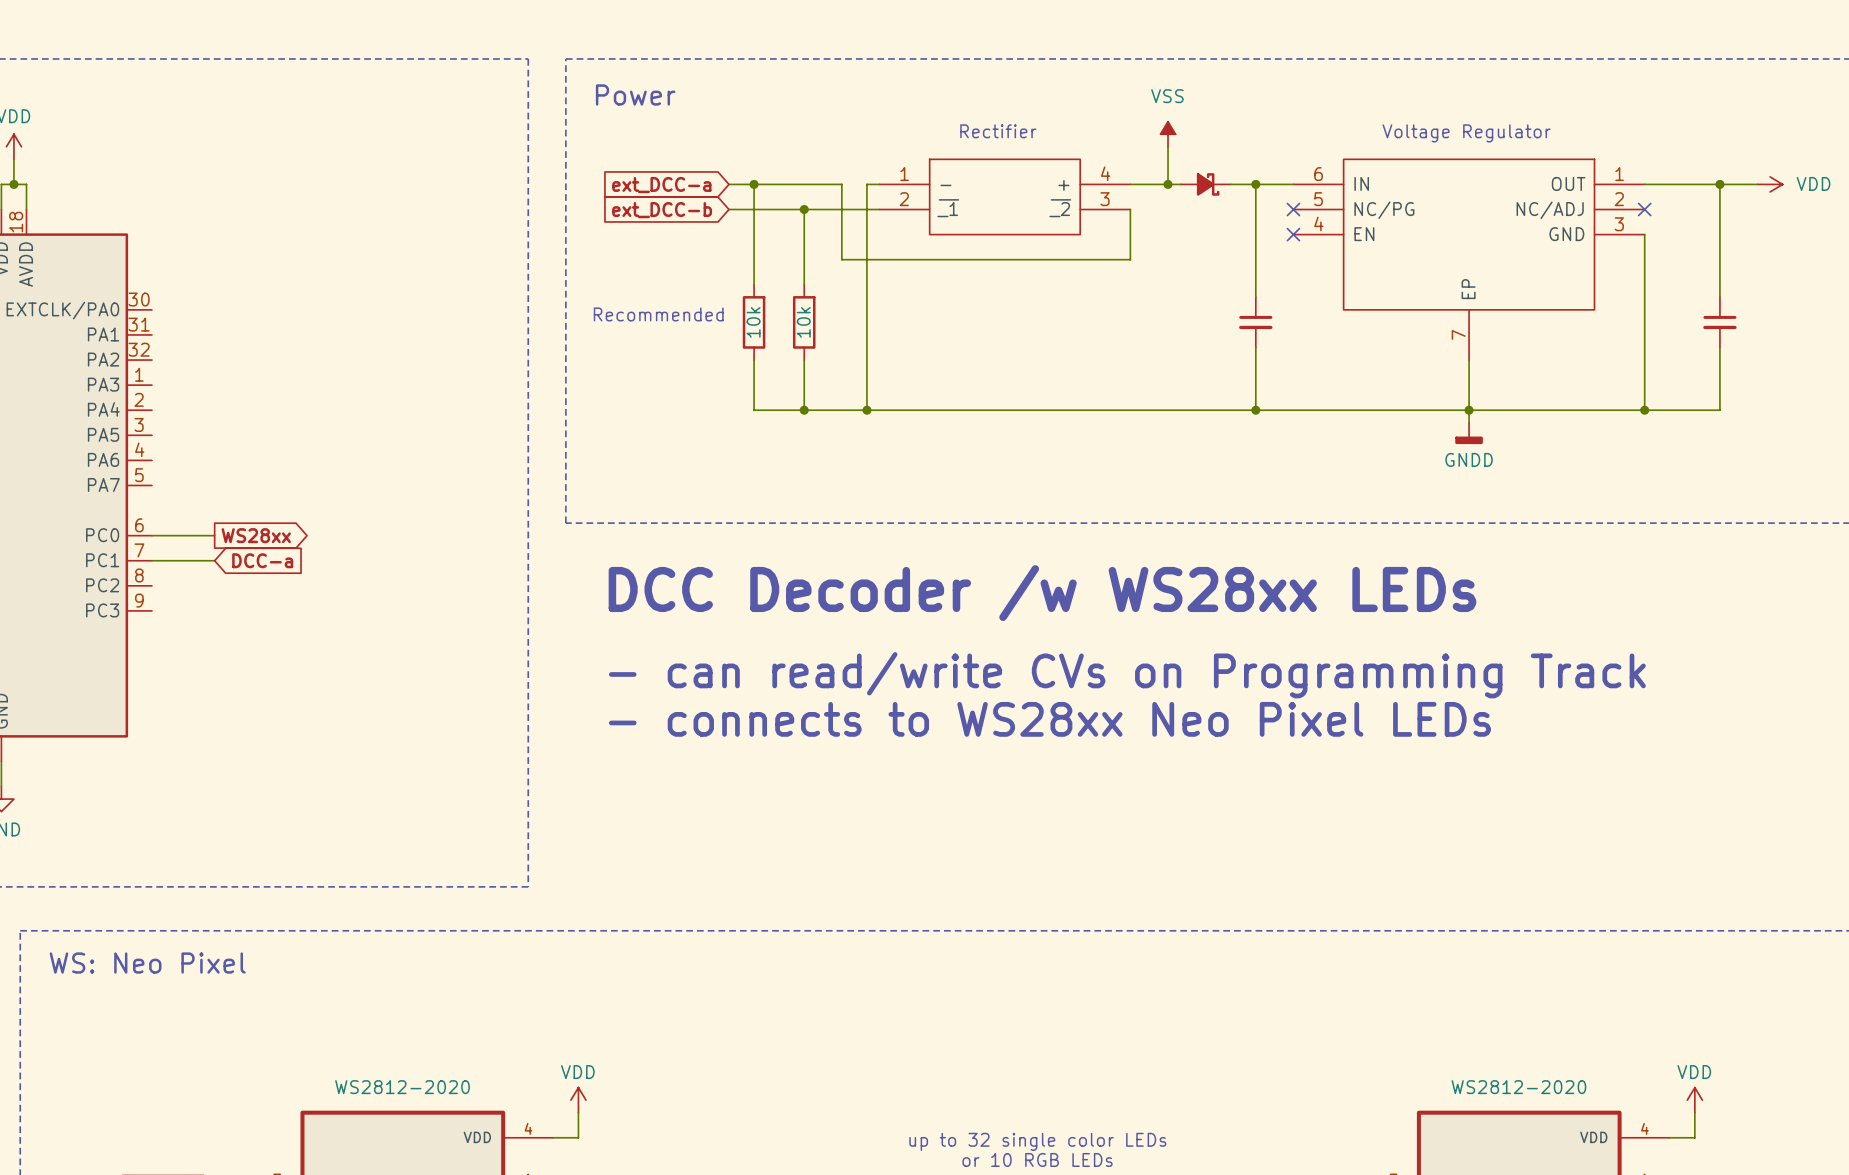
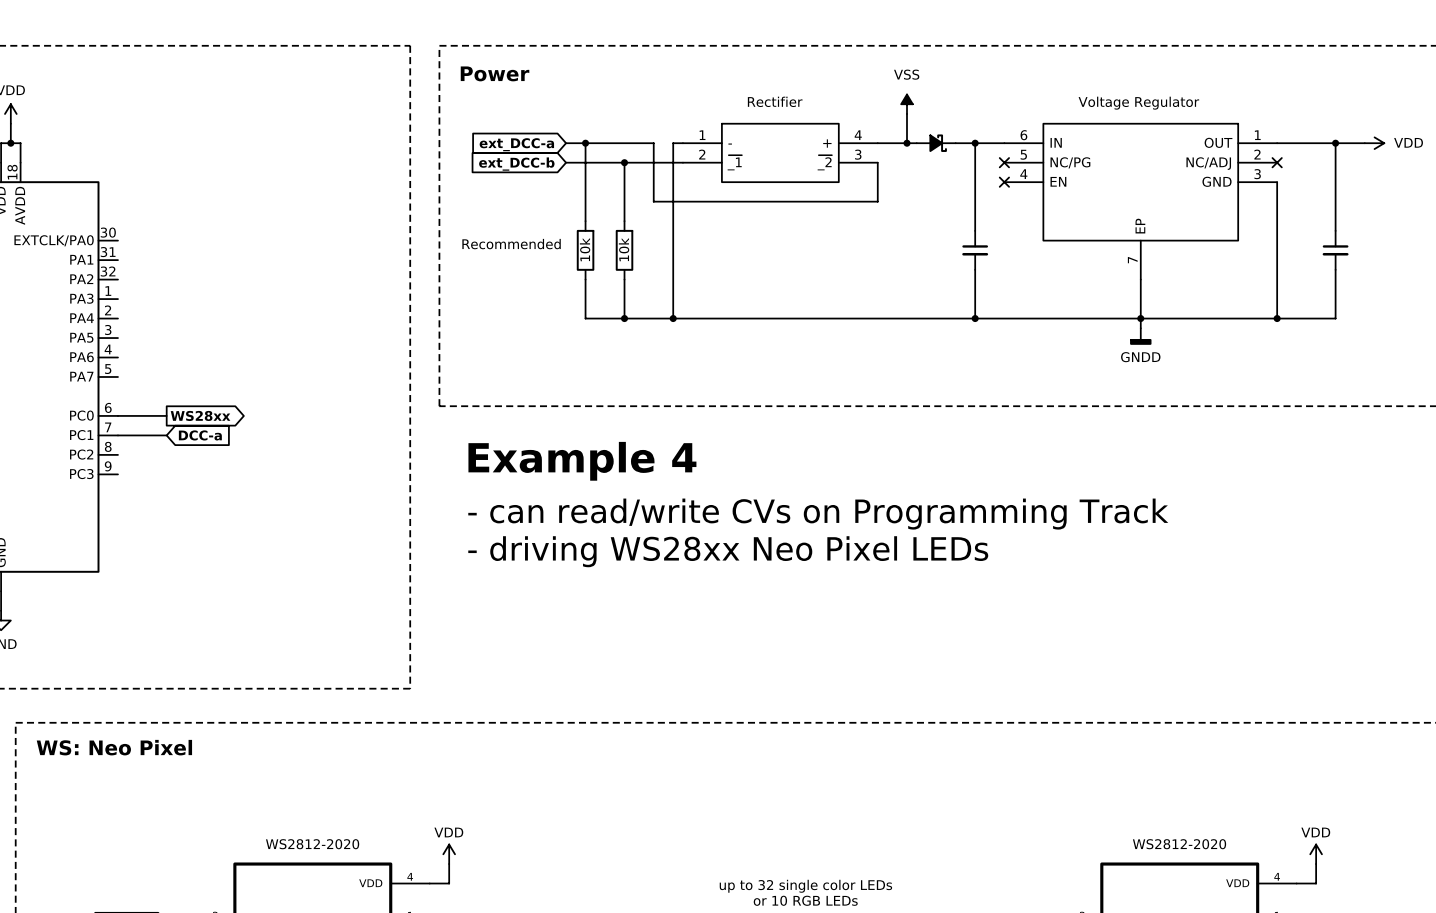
text: DCC Decoder /w WS28xx LEDs (1042, 593) -> Example 4 (582, 461)
text position: - can read/write CVs on Programming Track (1127, 675) -> - can read/write CVs on Programming Track (818, 514)
text: - connects to WS28xx Neo Pixel LEDs (1049, 719) -> - driving WS28xx Neo Pixel LEDs (728, 551)

